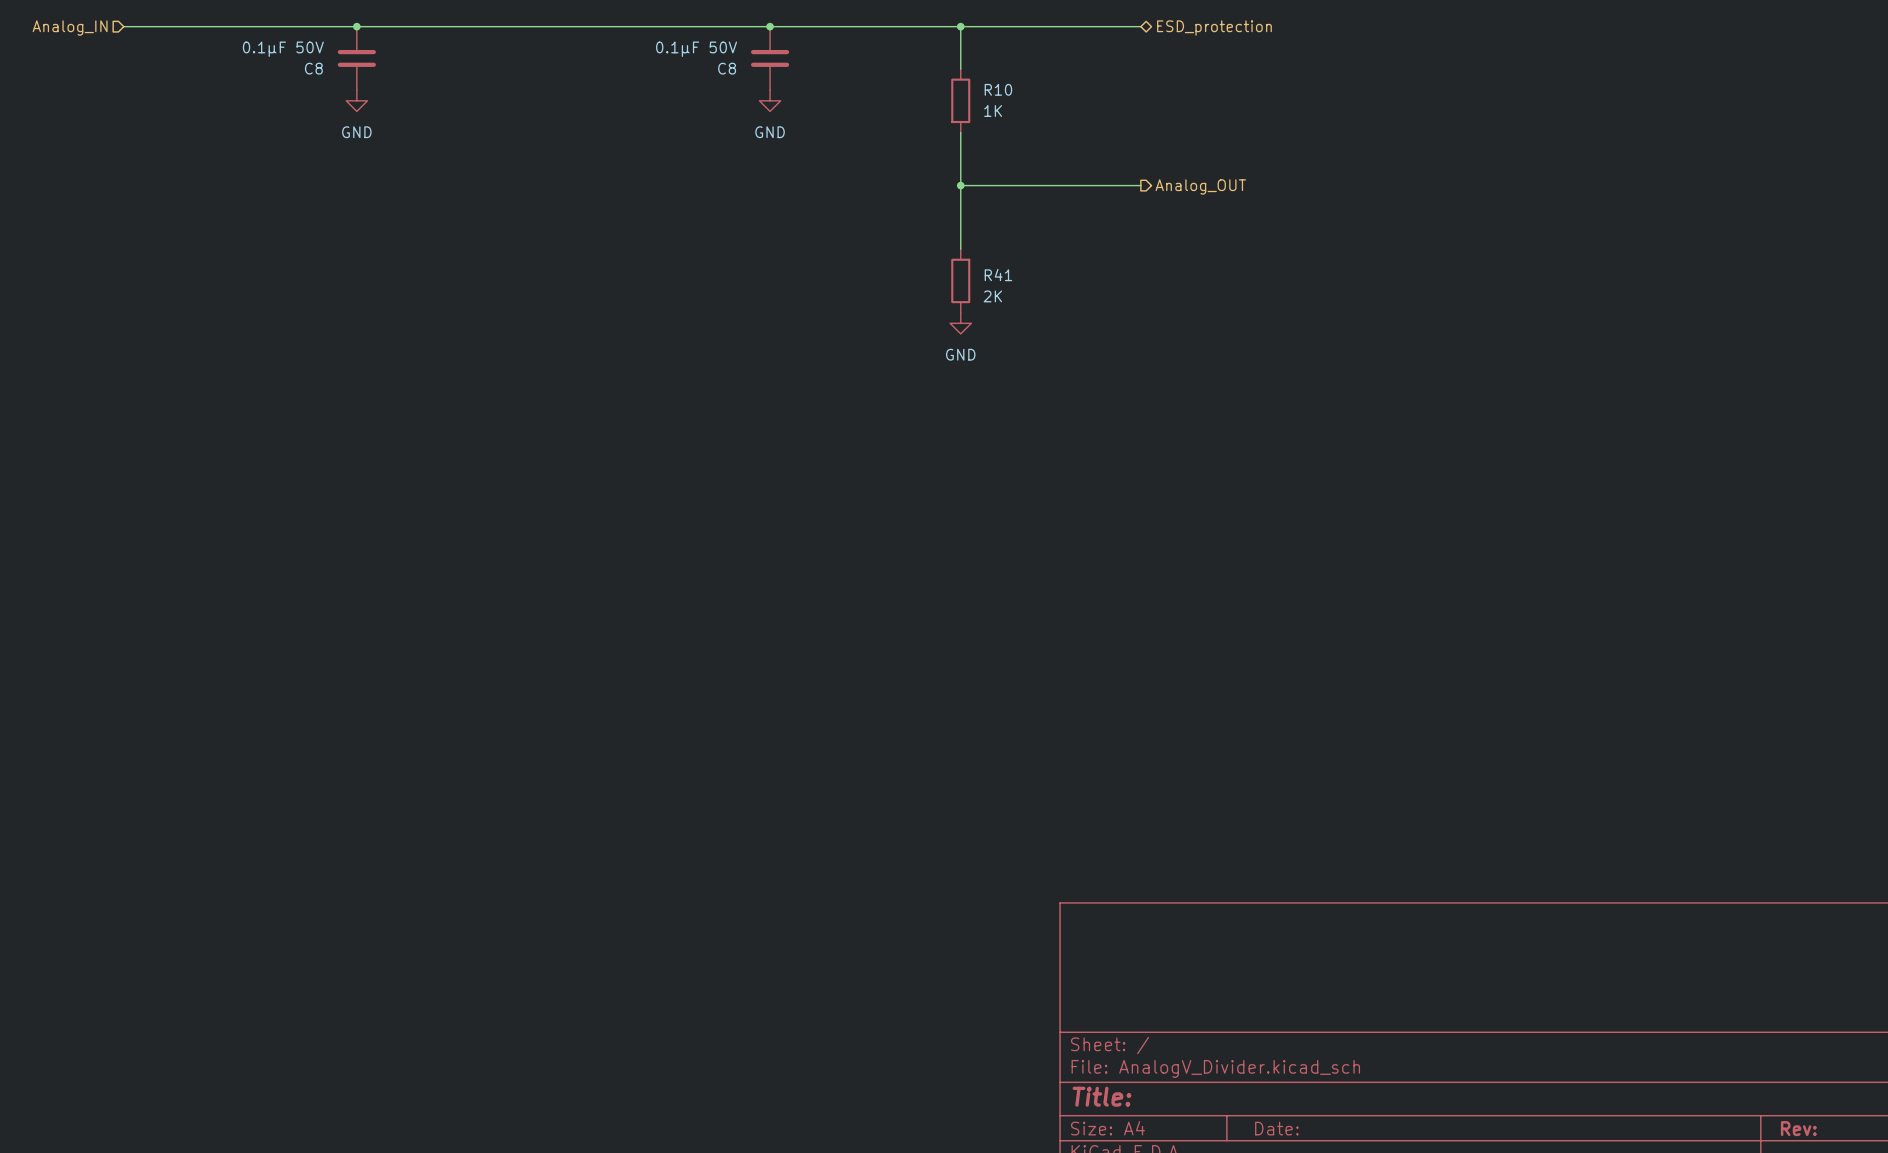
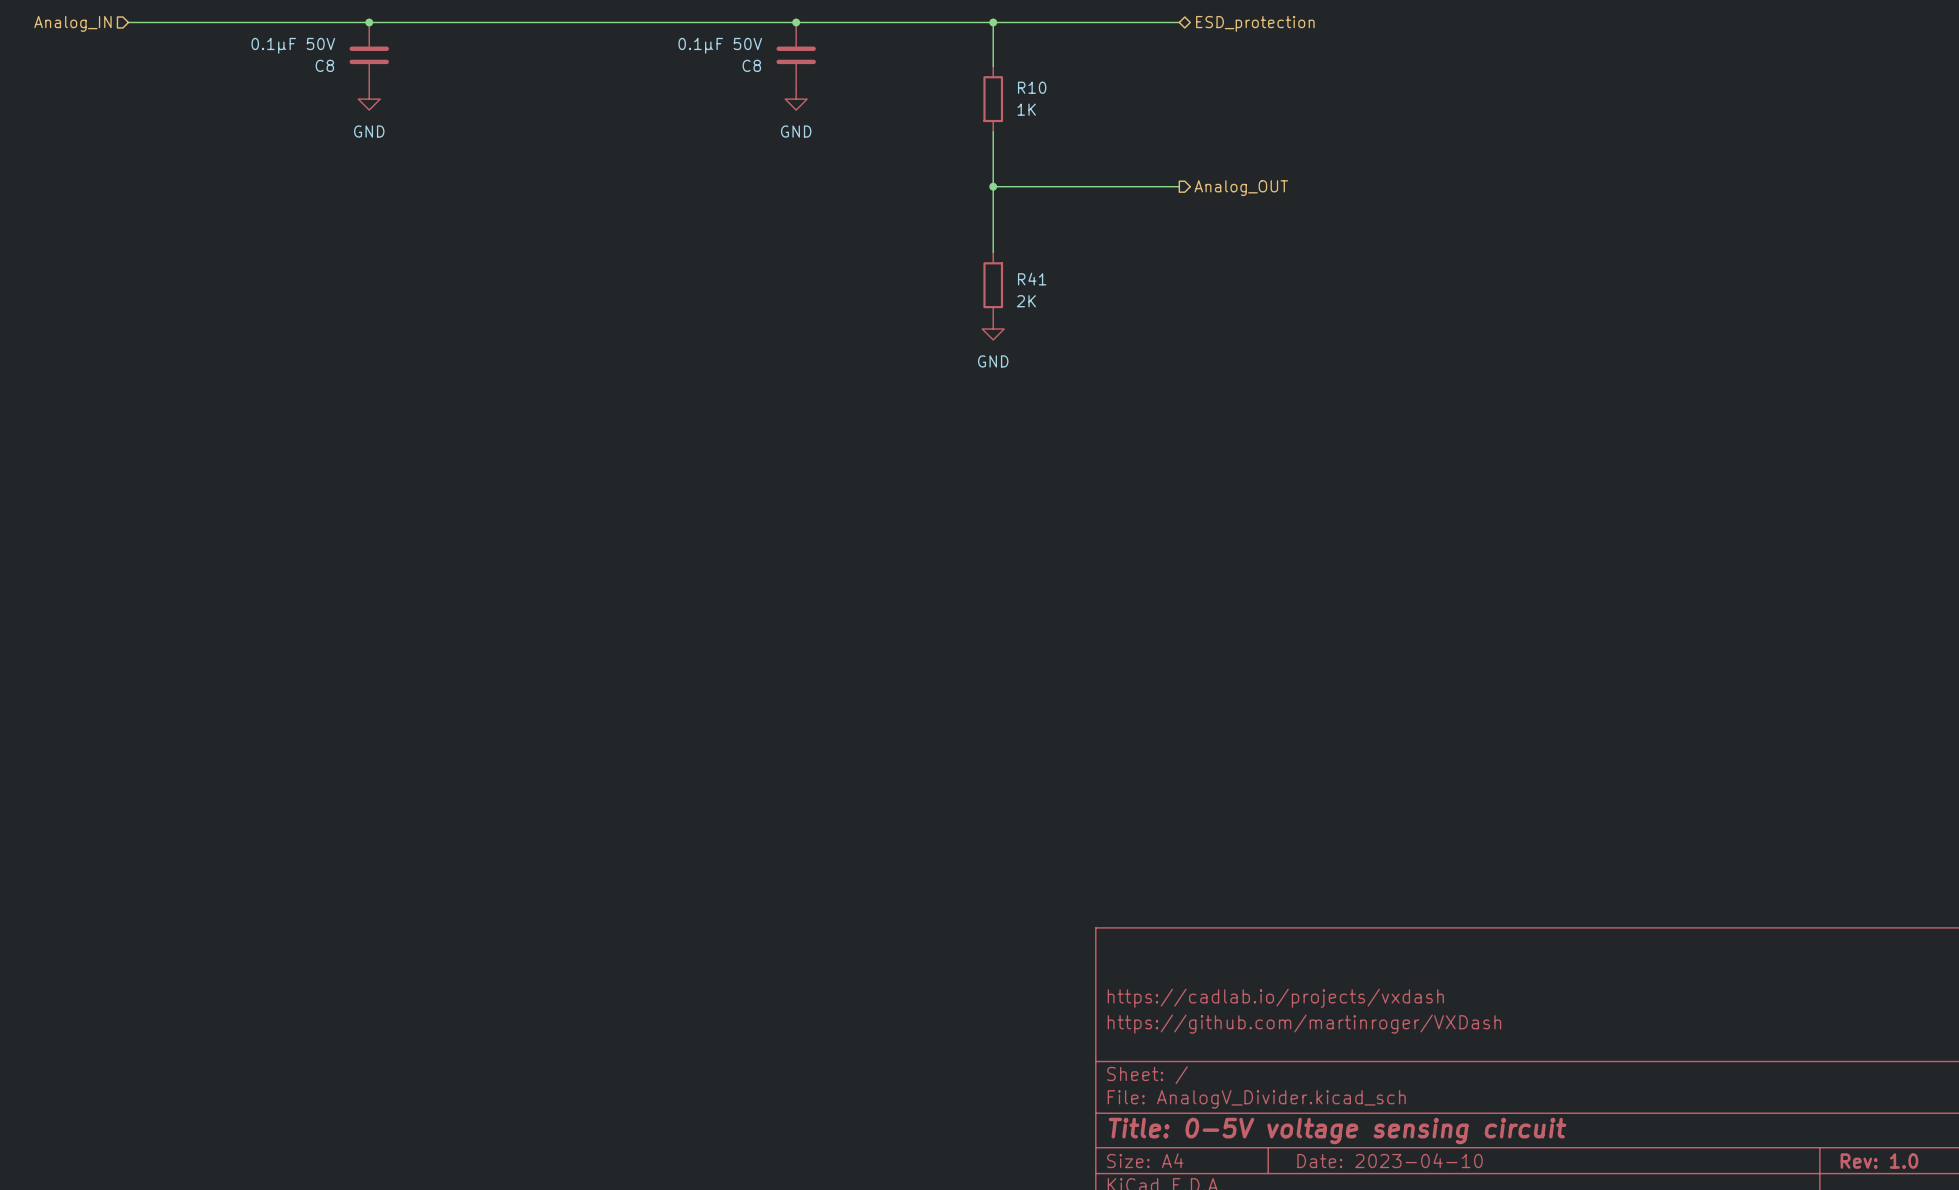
title block: none -> https://cadlab.io/projects/vxdash (1275, 998)
title block: none -> https://github.com/martinroger/VXDash (1304, 1024)
title block: Title: (1102, 1096) -> Title: 0-5V voltage sensing circuit (1337, 1130)
title block: Date: (1276, 1128) -> Date: 2023-04-10 (1390, 1160)
title block: Rev: (1798, 1128) -> Rev: 1.0 (1879, 1161)

